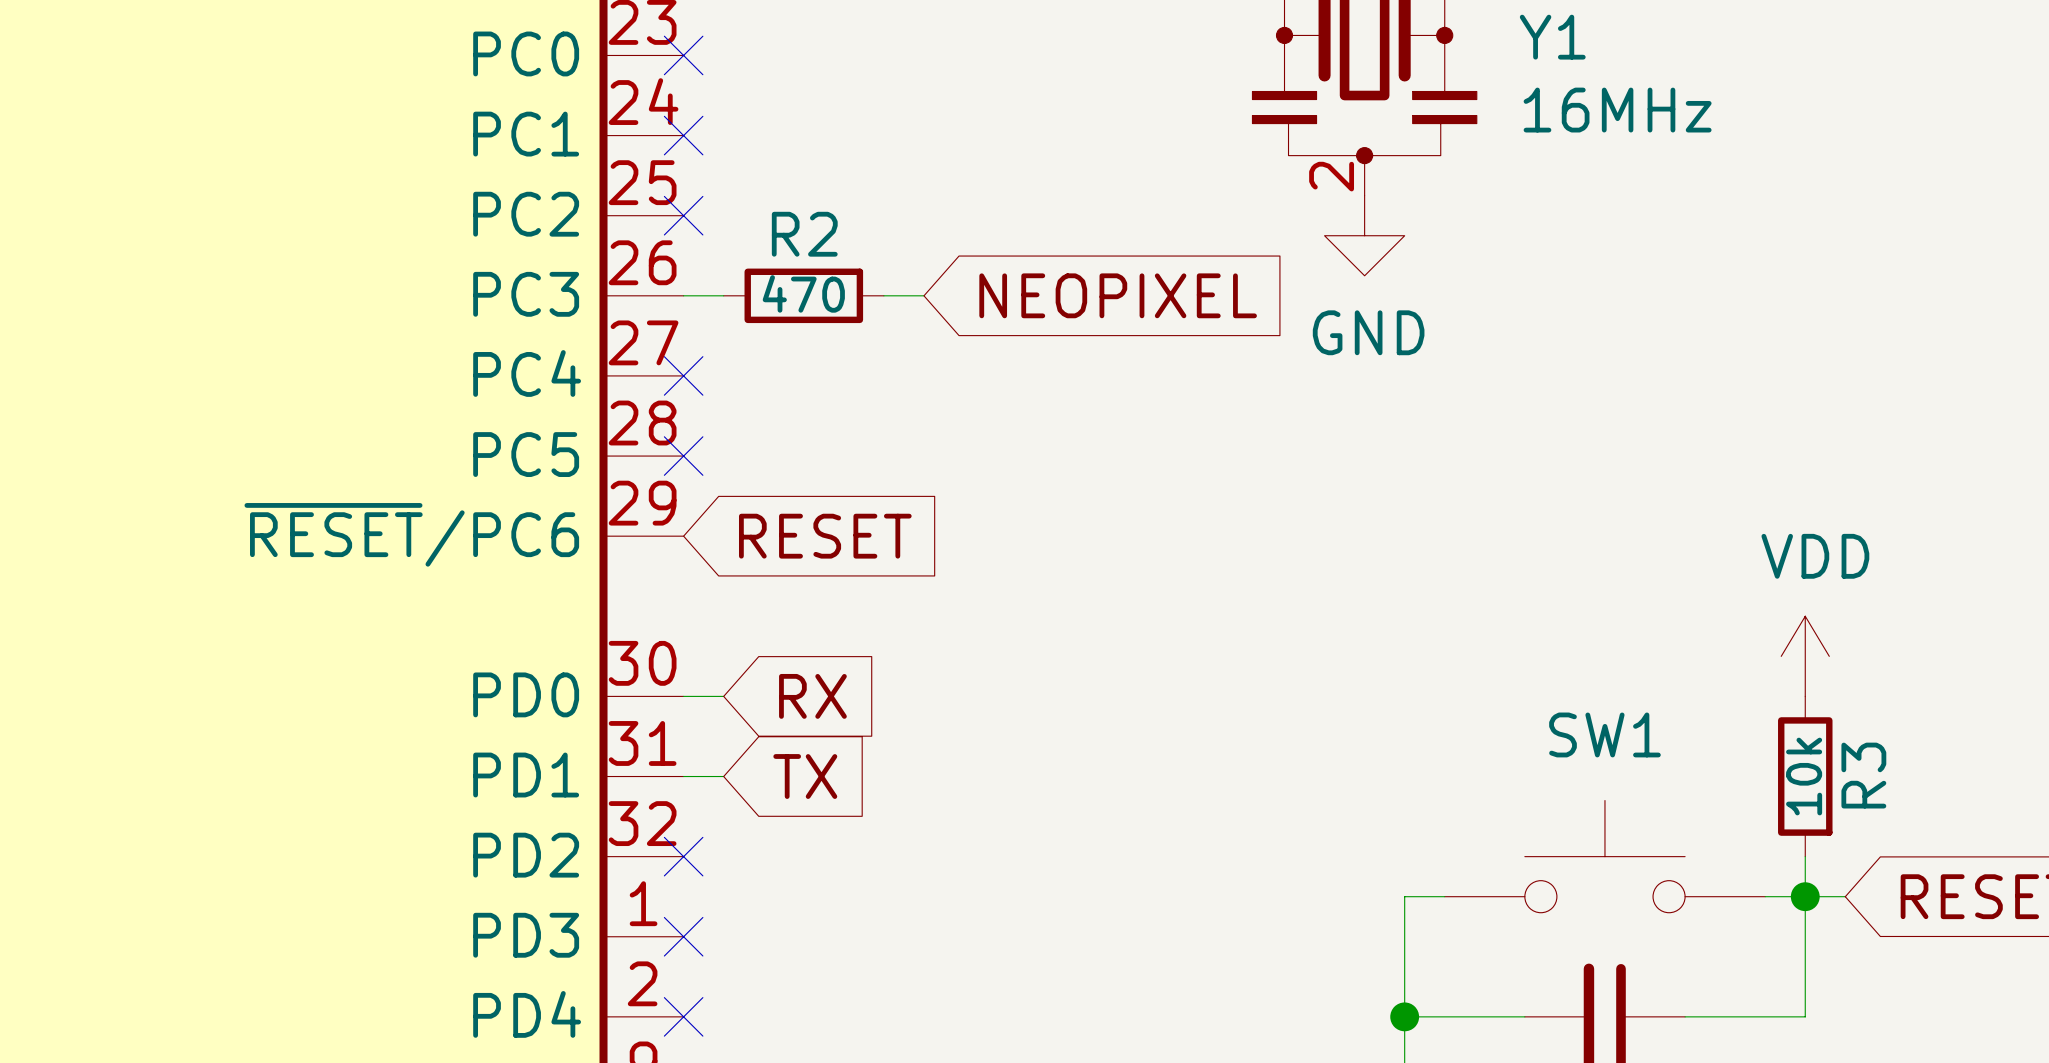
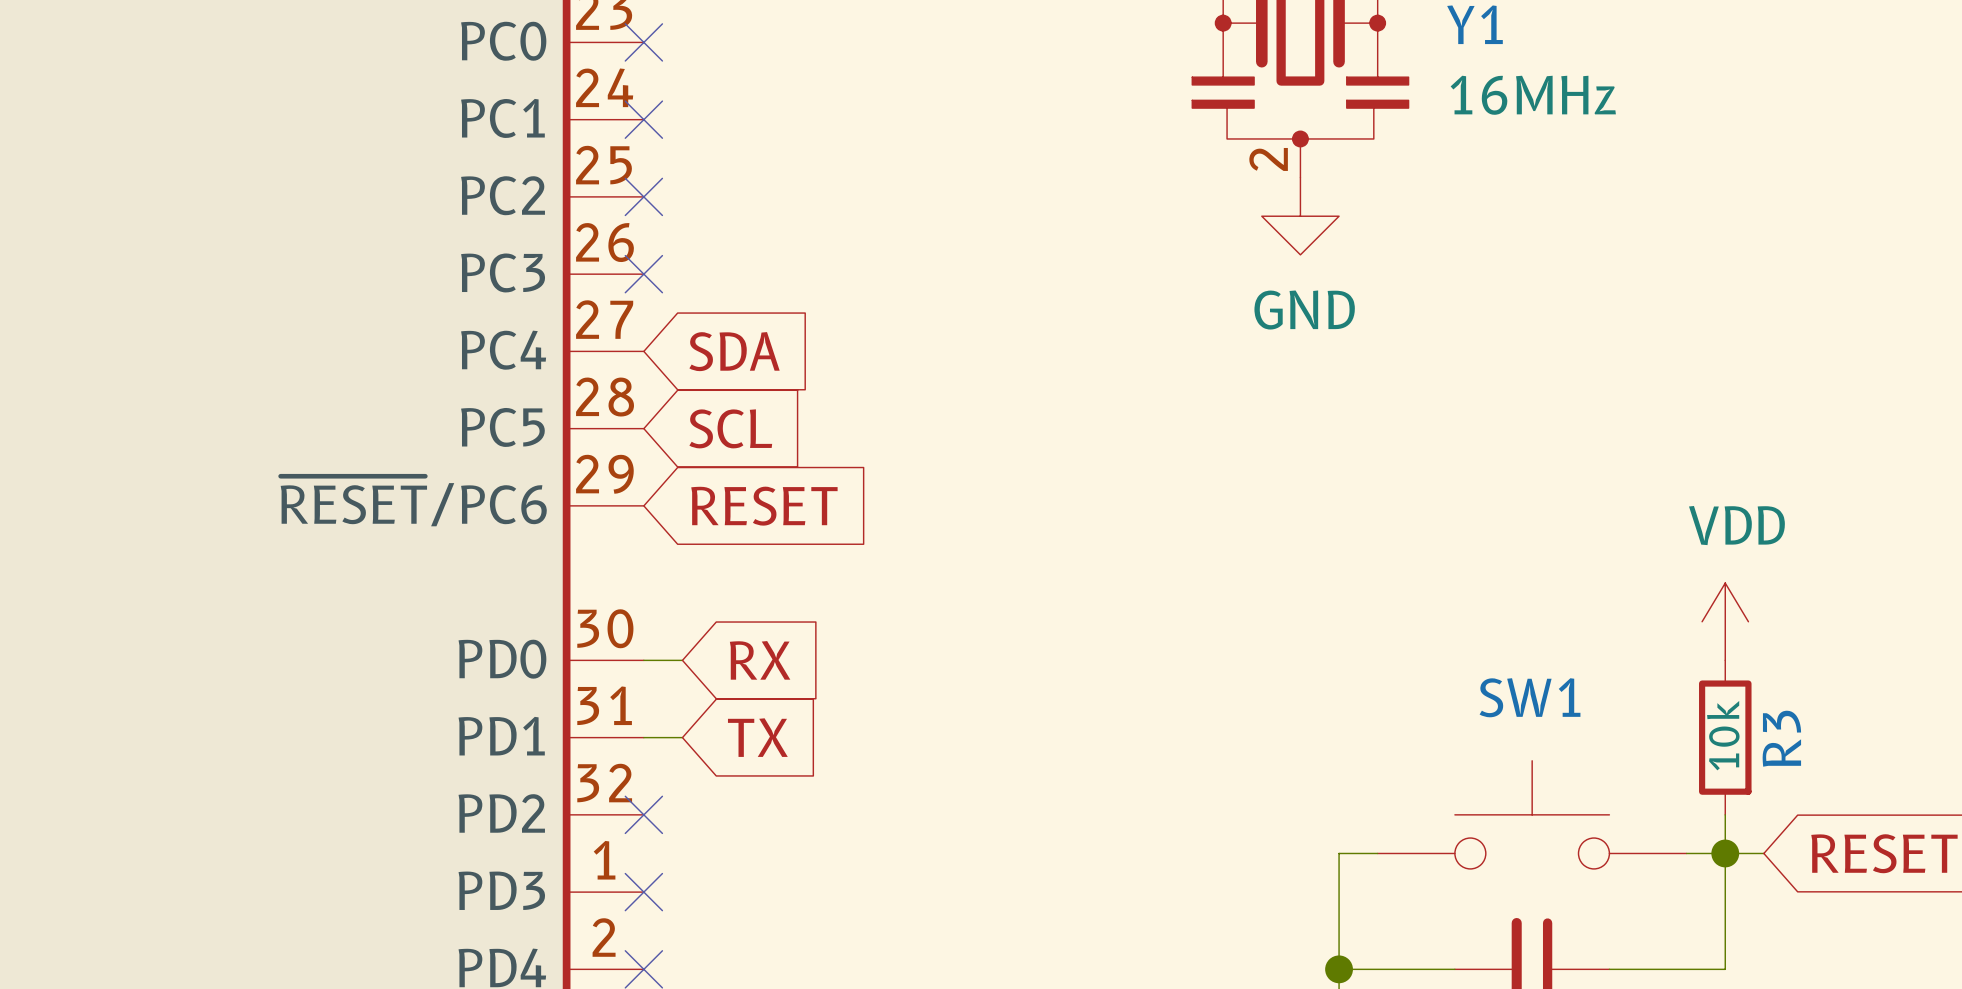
wire: (683, 295) (723, 295) -> none
no-connect mark: none -> (643, 274)
R2: 470 (803, 295) -> none
wire: (883, 295) (923, 295) -> none
global label: NEOPIXEL (1118, 295) -> none
no-connect mark: (683, 375) -> none
global label: none -> SDA (734, 351)
no-connect mark: (683, 456) -> none
global label: none -> SCL (730, 428)

